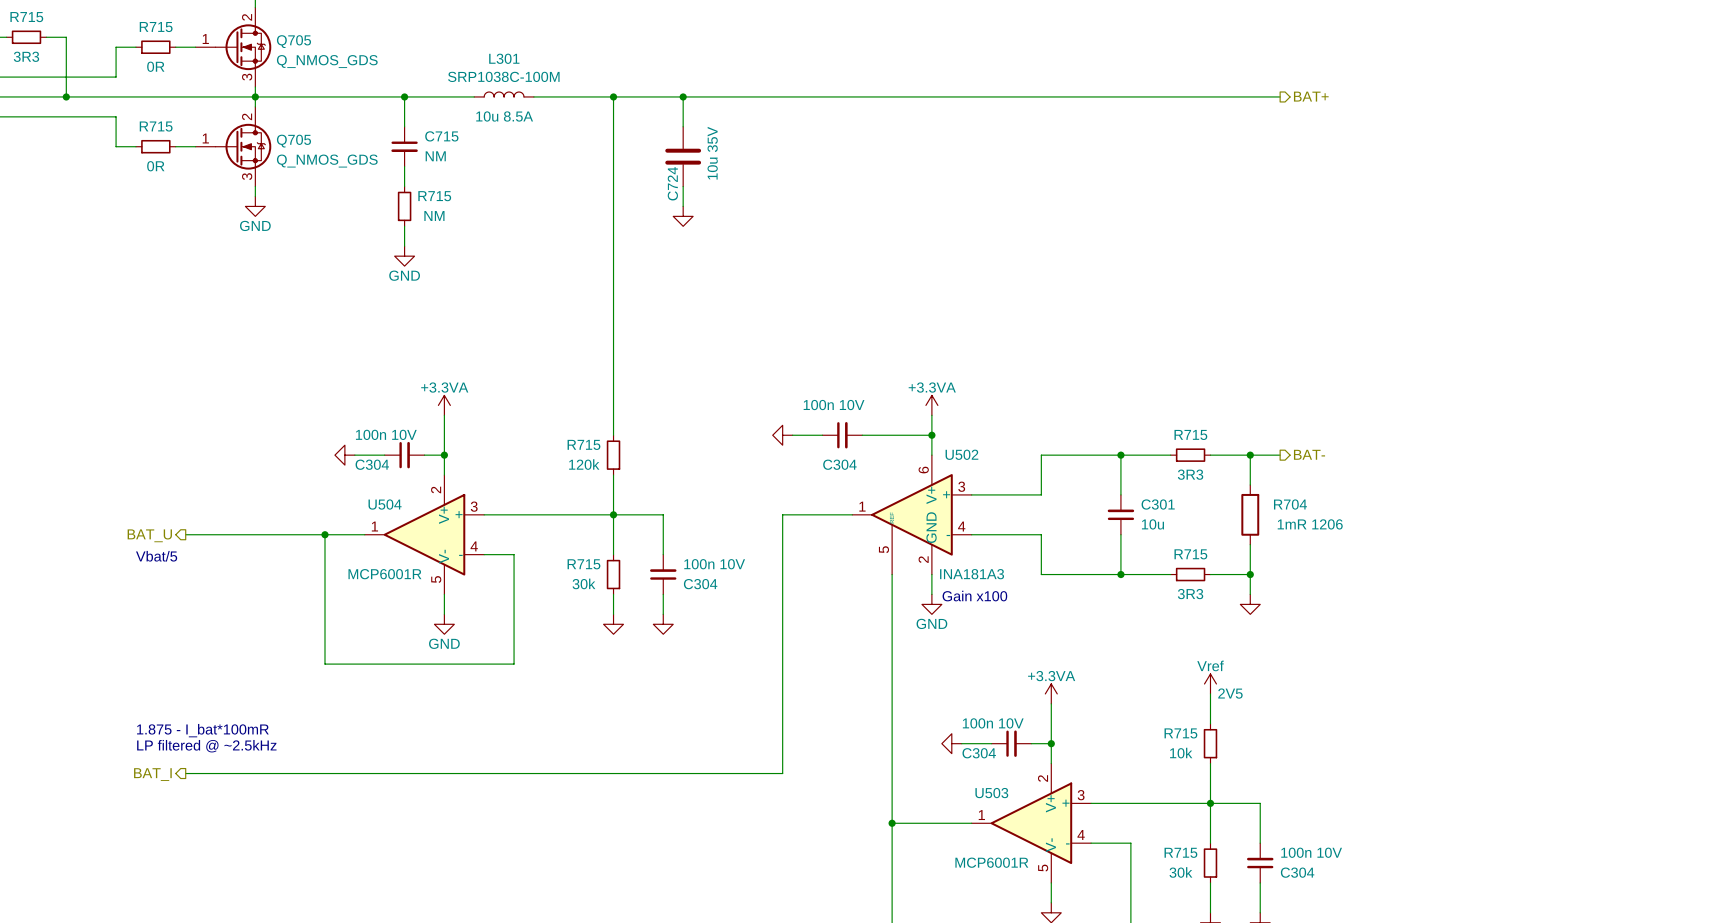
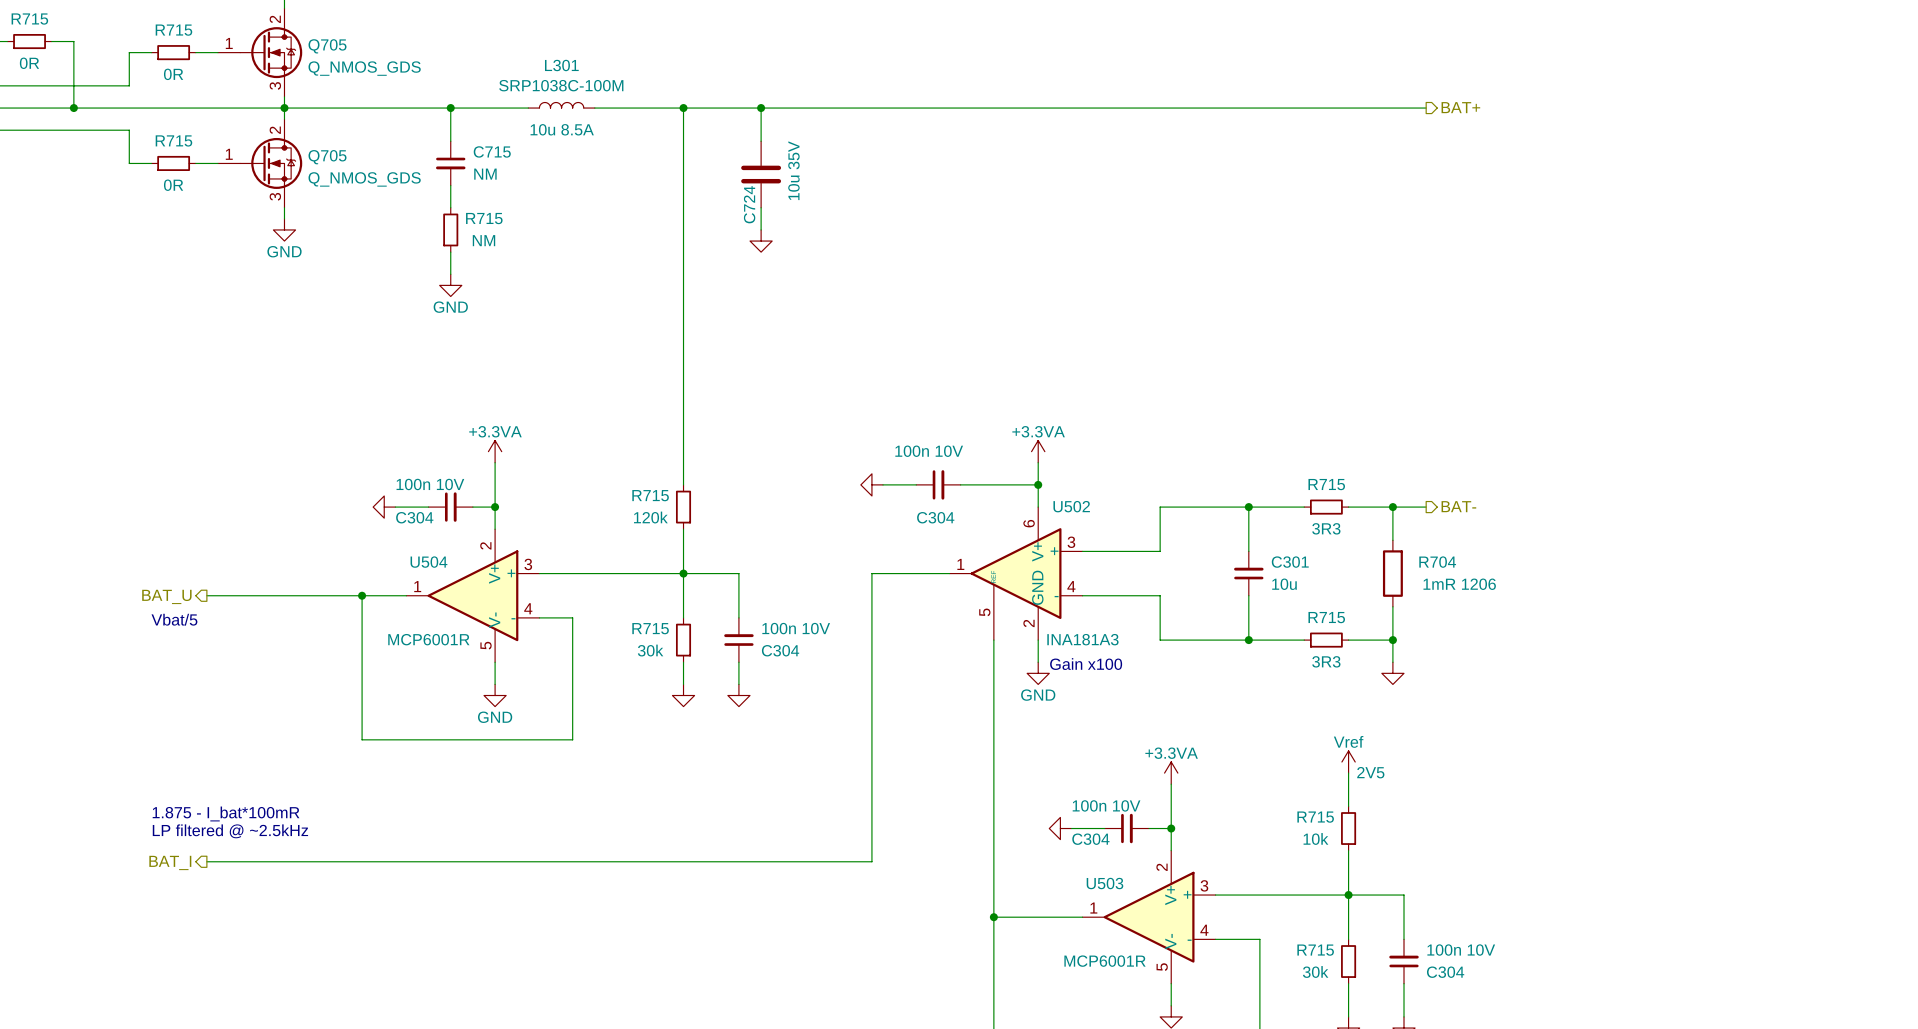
R715 value: 3R3 (26, 56) -> 0R (29, 63)

